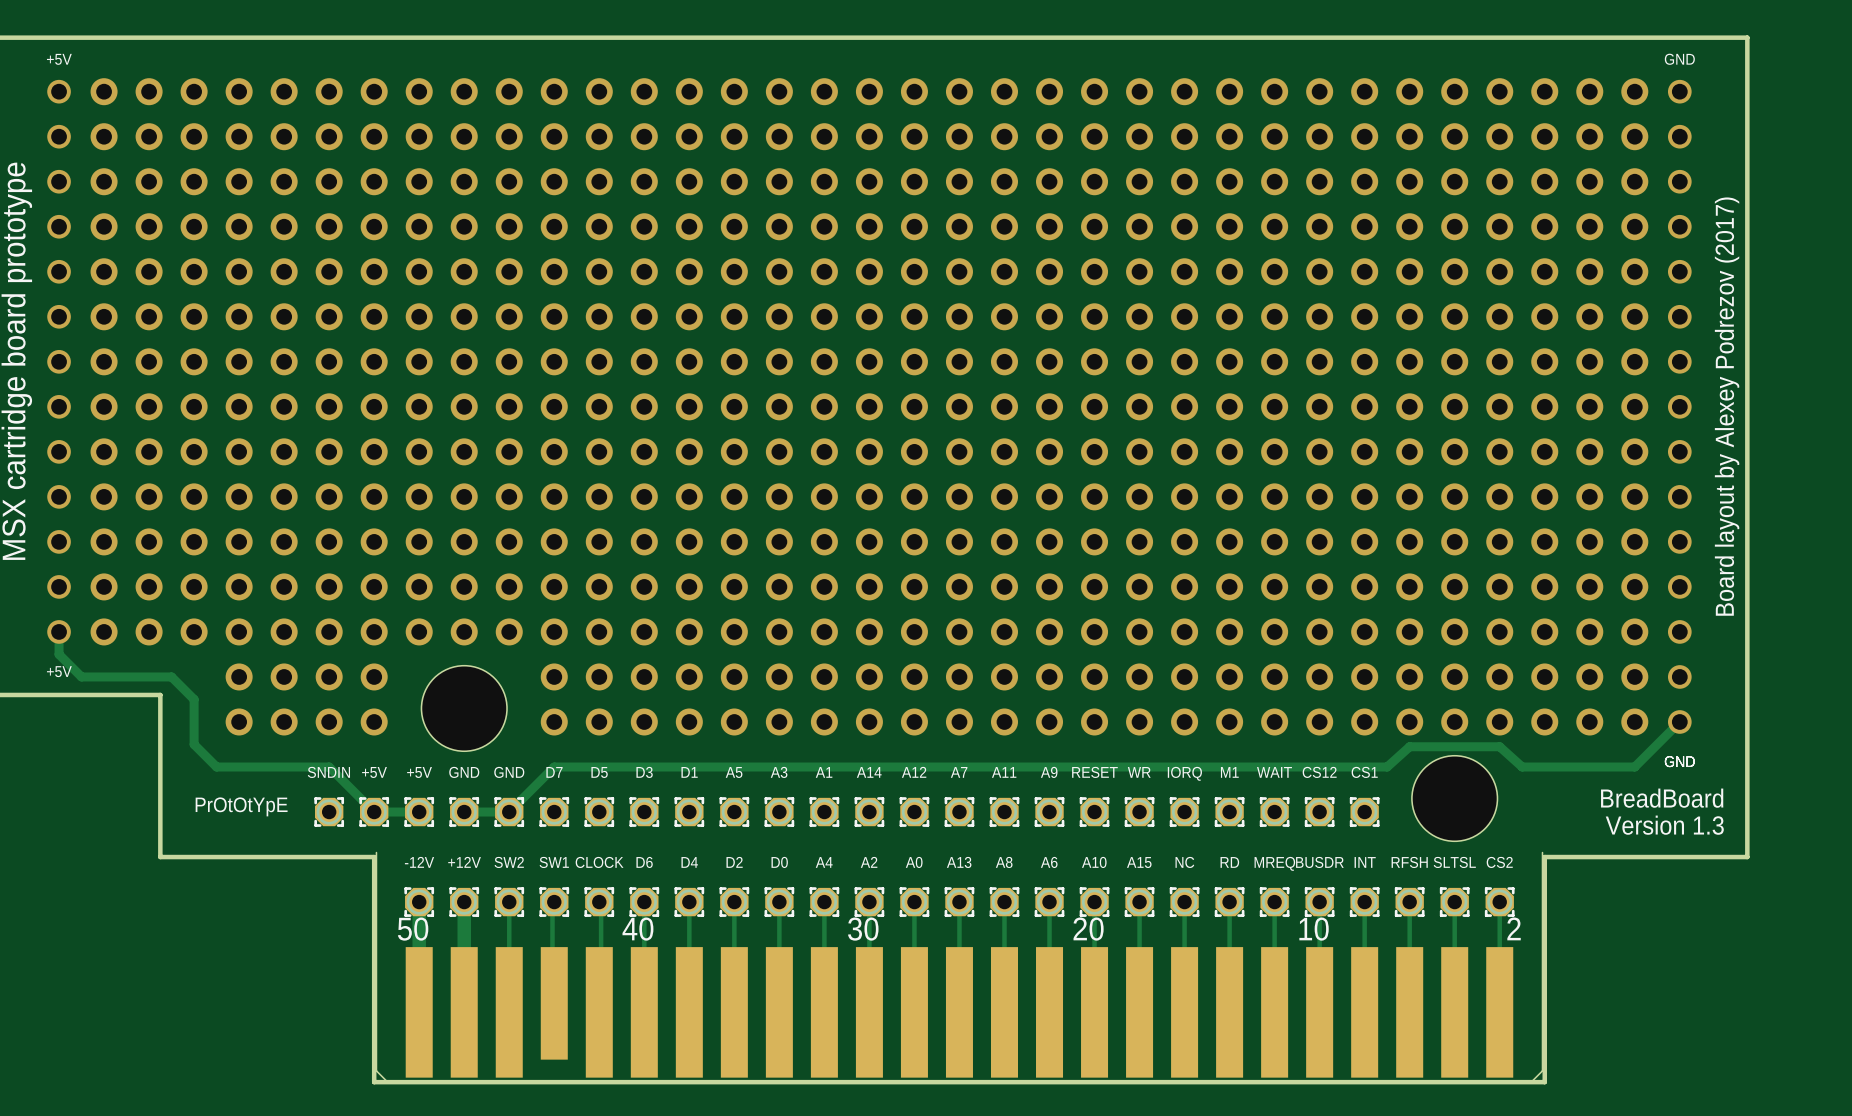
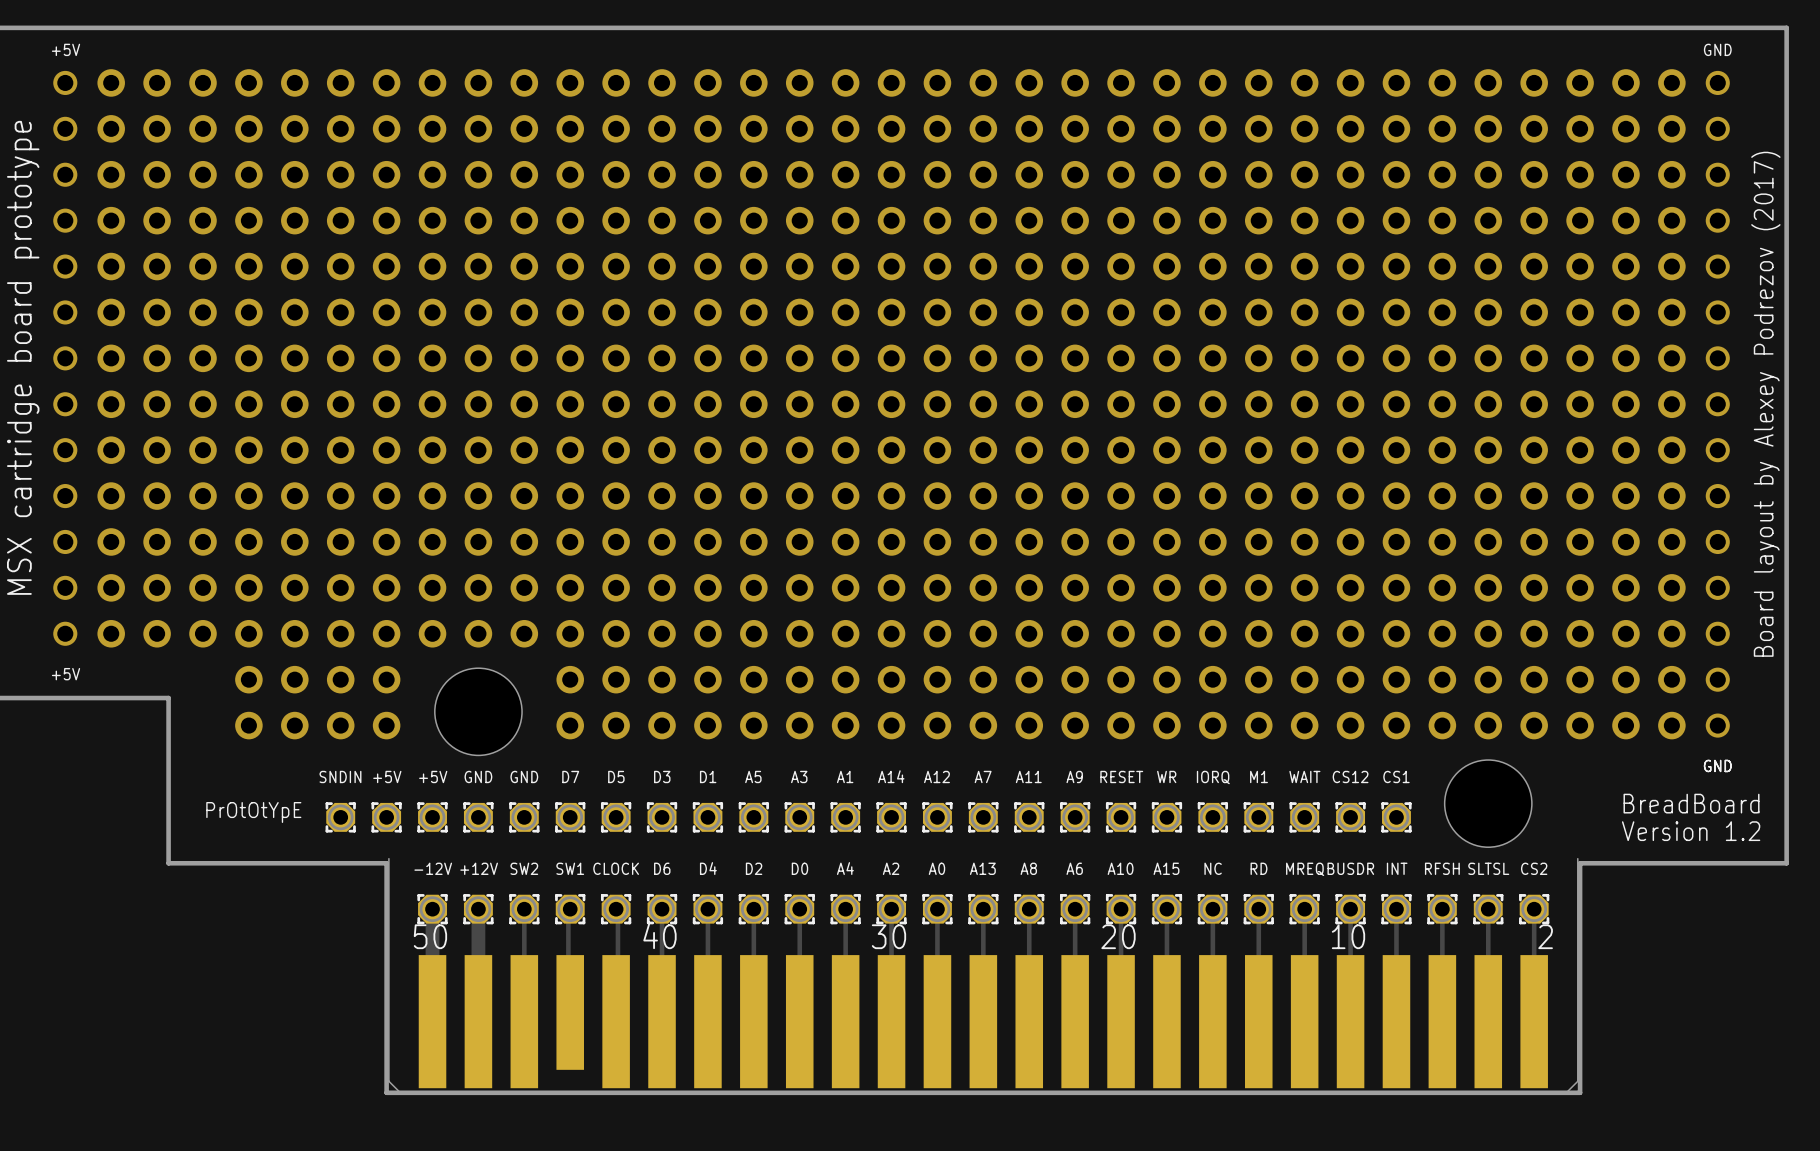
track: (59, 631) (59, 654) (81, 676) (171, 676) (194, 699) (194, 744) (216, 767) (329, 767) (374, 812) (419, 812) -> none
track: (1679, 721) (1634, 767) (1522, 767) (1499, 746) (1409, 746) (1387, 767) (554, 767) (509, 812) (464, 812) -> none
text: Version 1.3 (1664, 825) -> Version 1.2 (1691, 831)

